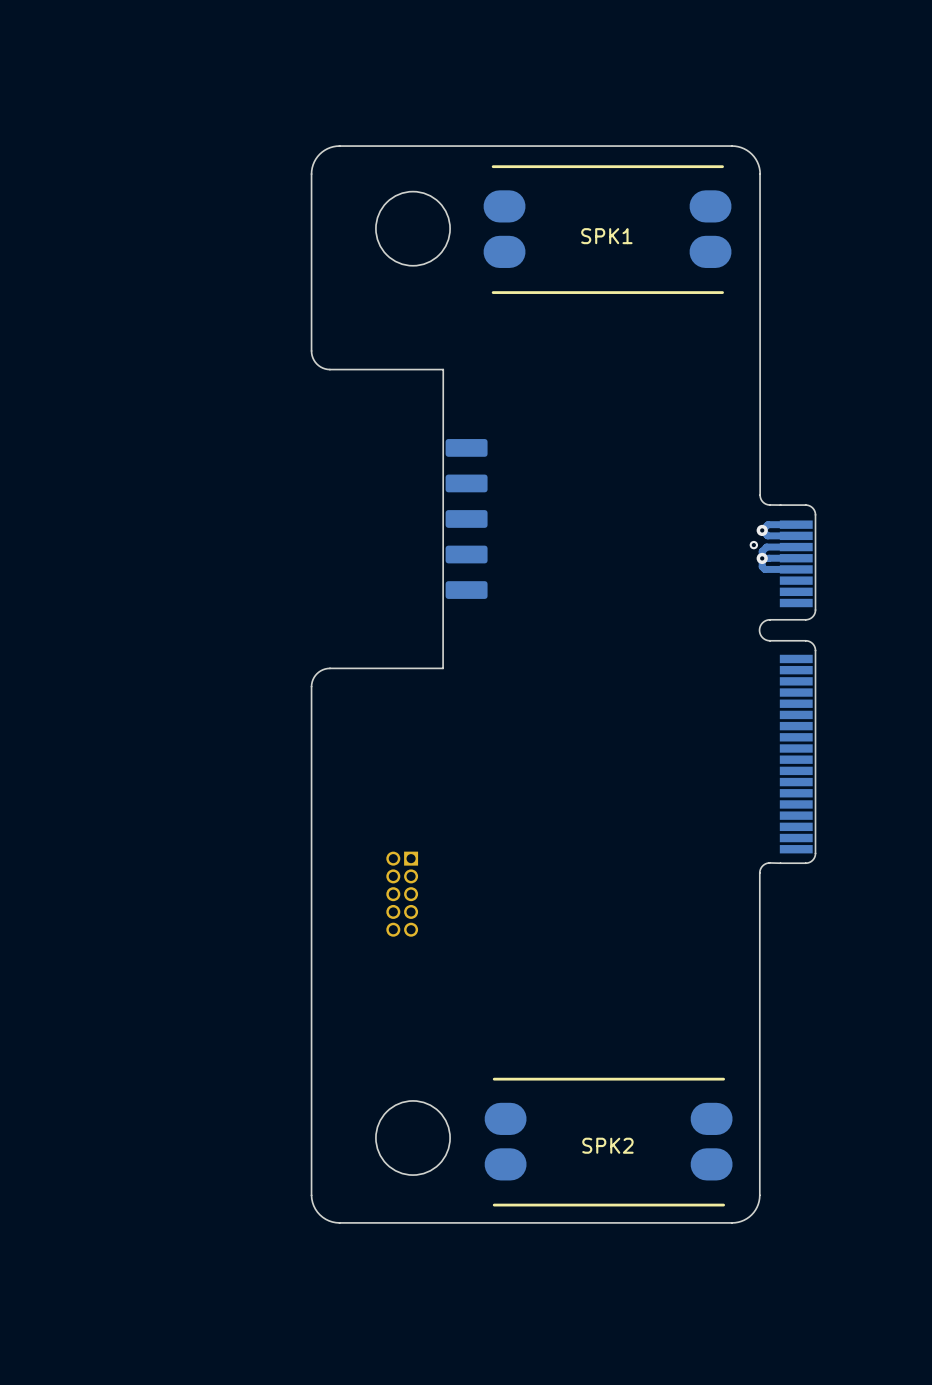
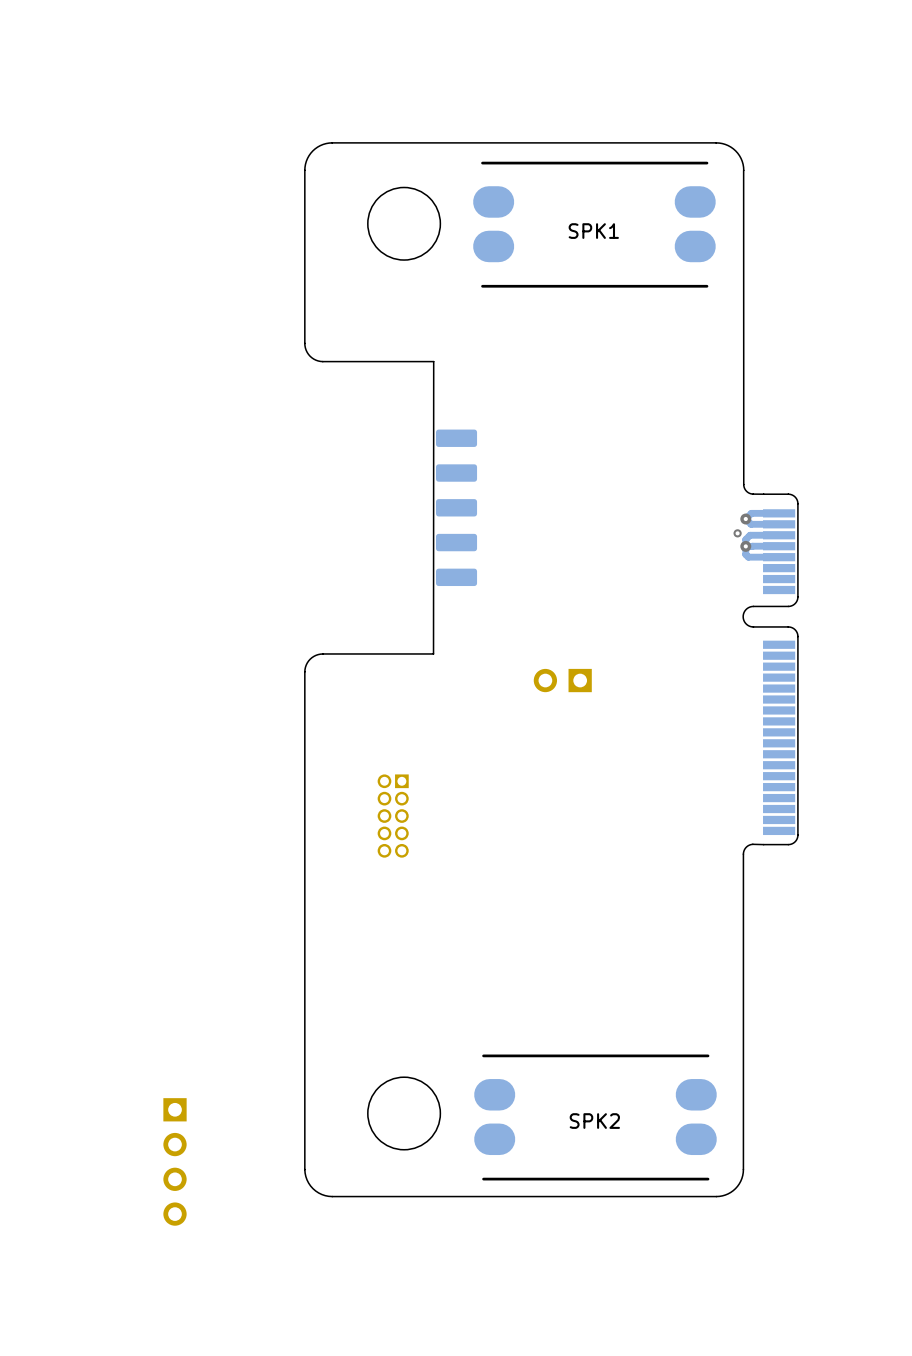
part: none -> (562, 680)
part position: (402, 894) -> (393, 816)
part: none -> (175, 1161)

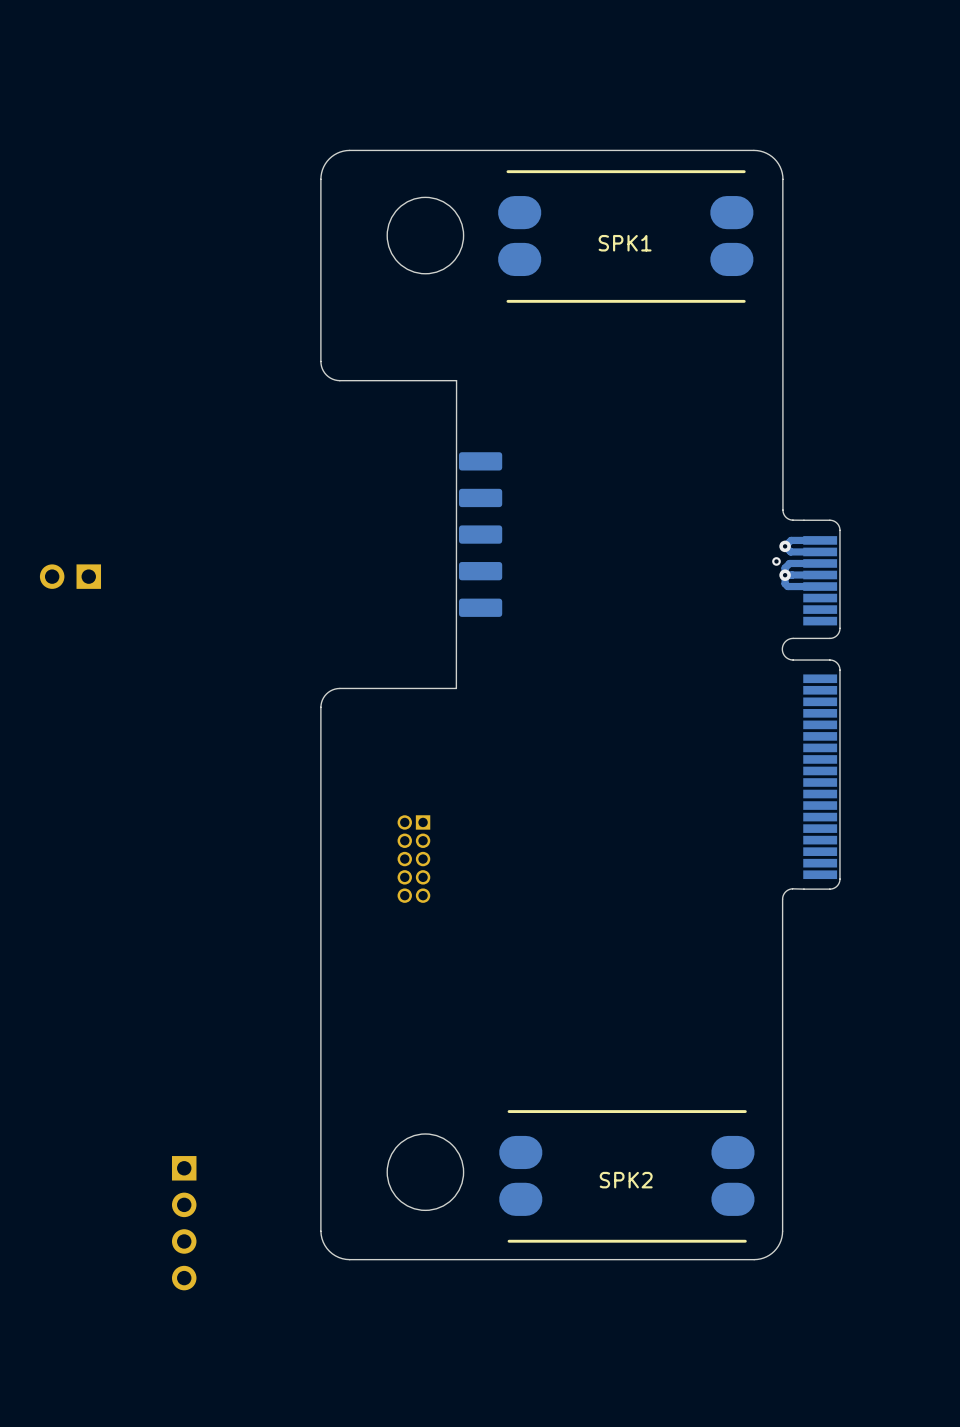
part: none -> (70, 576)
part: (562, 680) -> none

